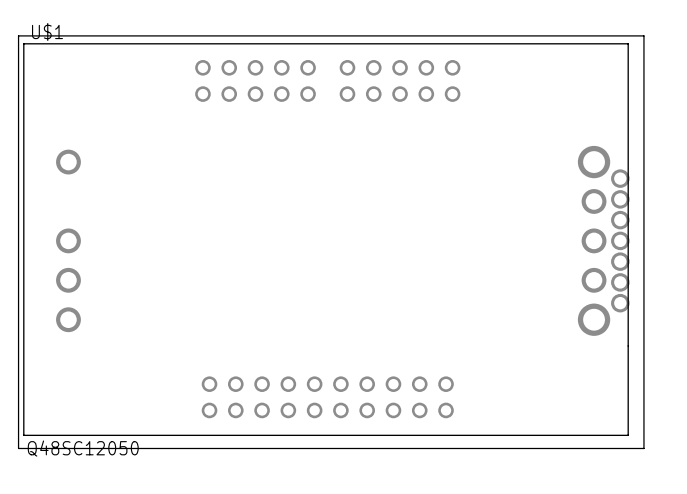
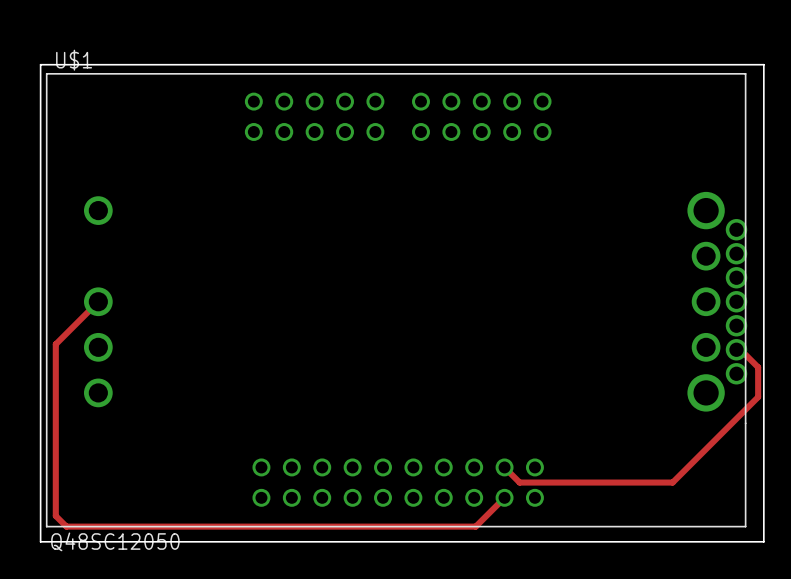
track: none -> (98, 301) (55, 344) (55, 515) (66, 526) (475, 526) (504, 497)
track: none -> (736, 349) (740, 349) (758, 367) (758, 397) (672, 482) (519, 482) (504, 467)

